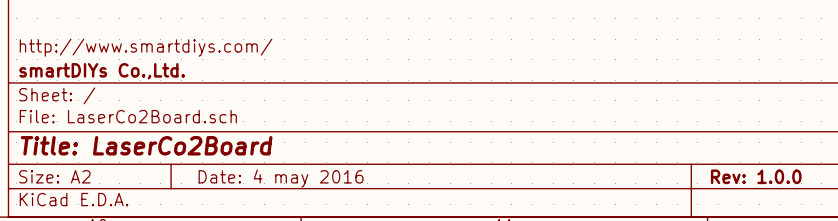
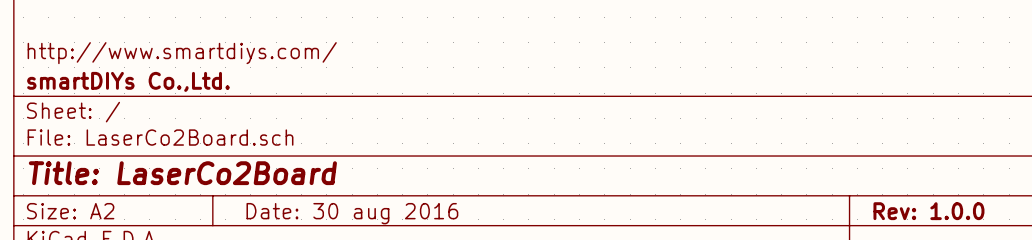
title block: Date: 4 may 2016 (281, 178) -> Date: 30 aug 2016 (352, 213)

